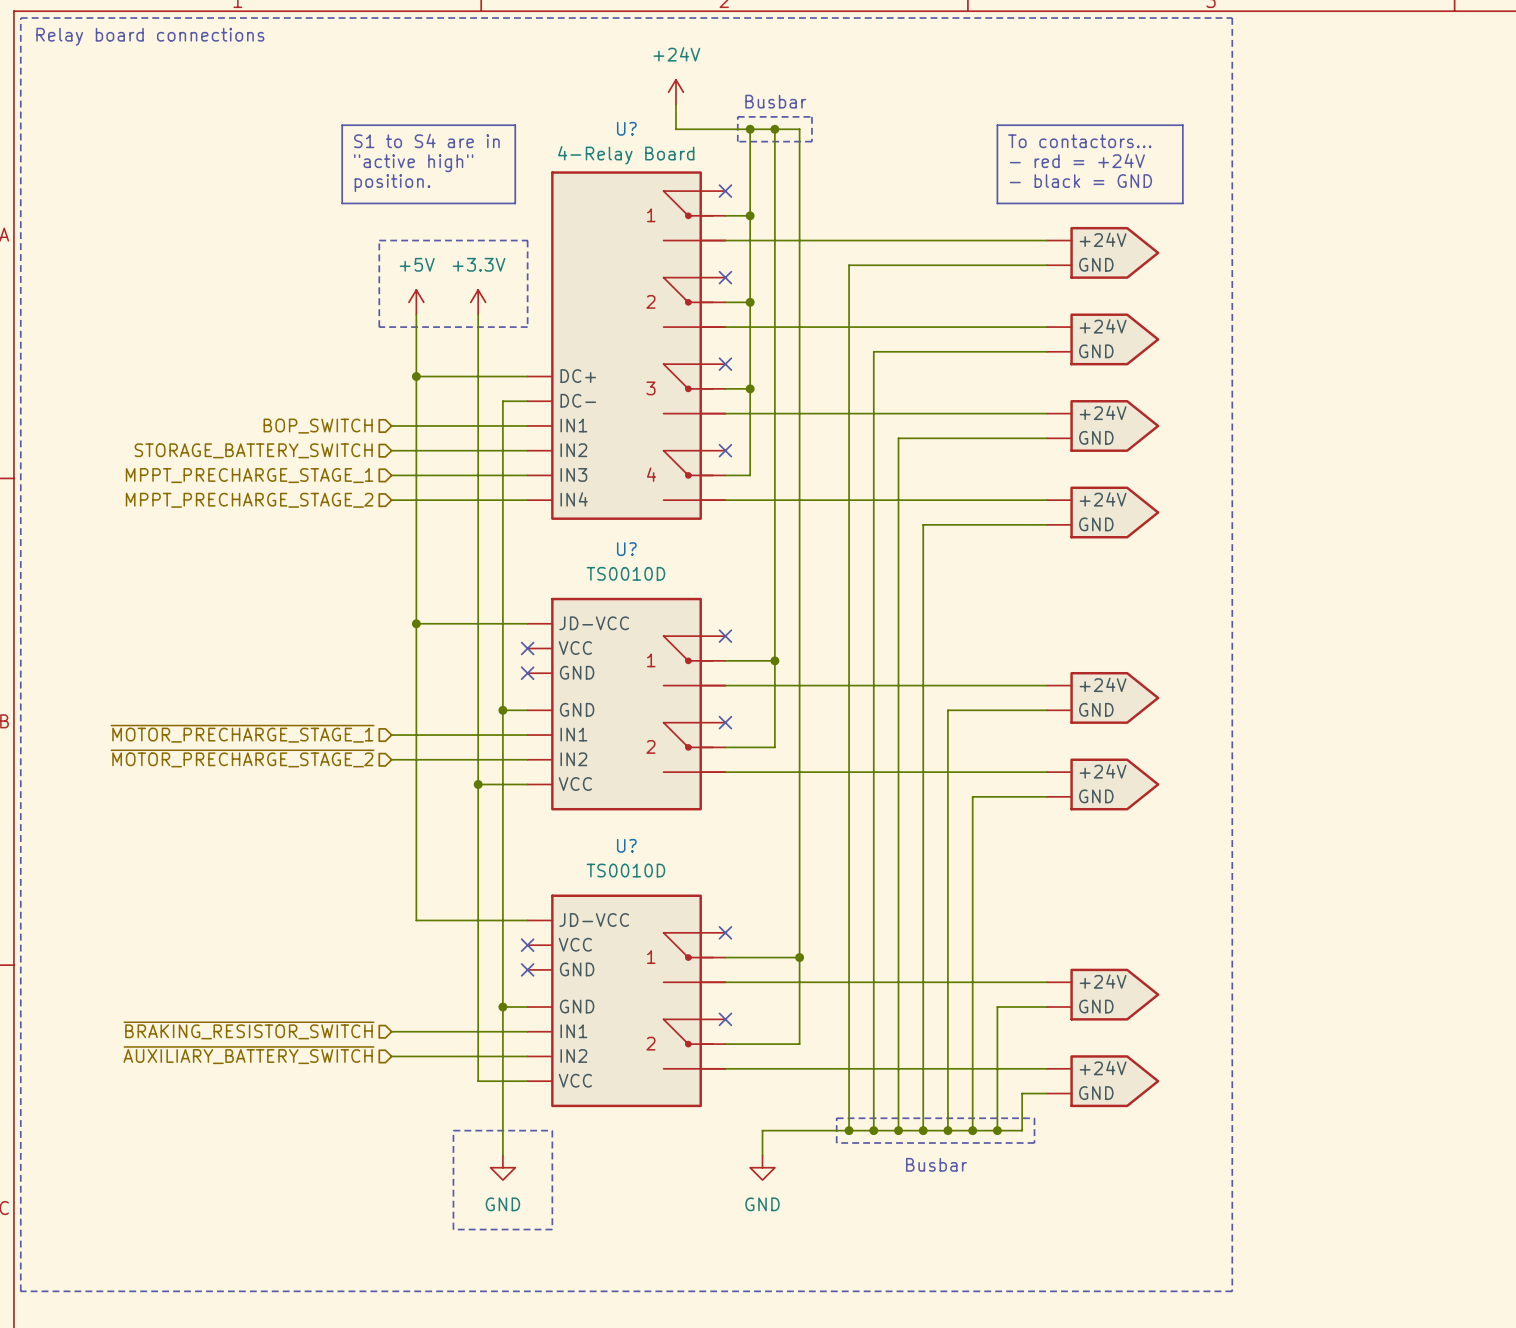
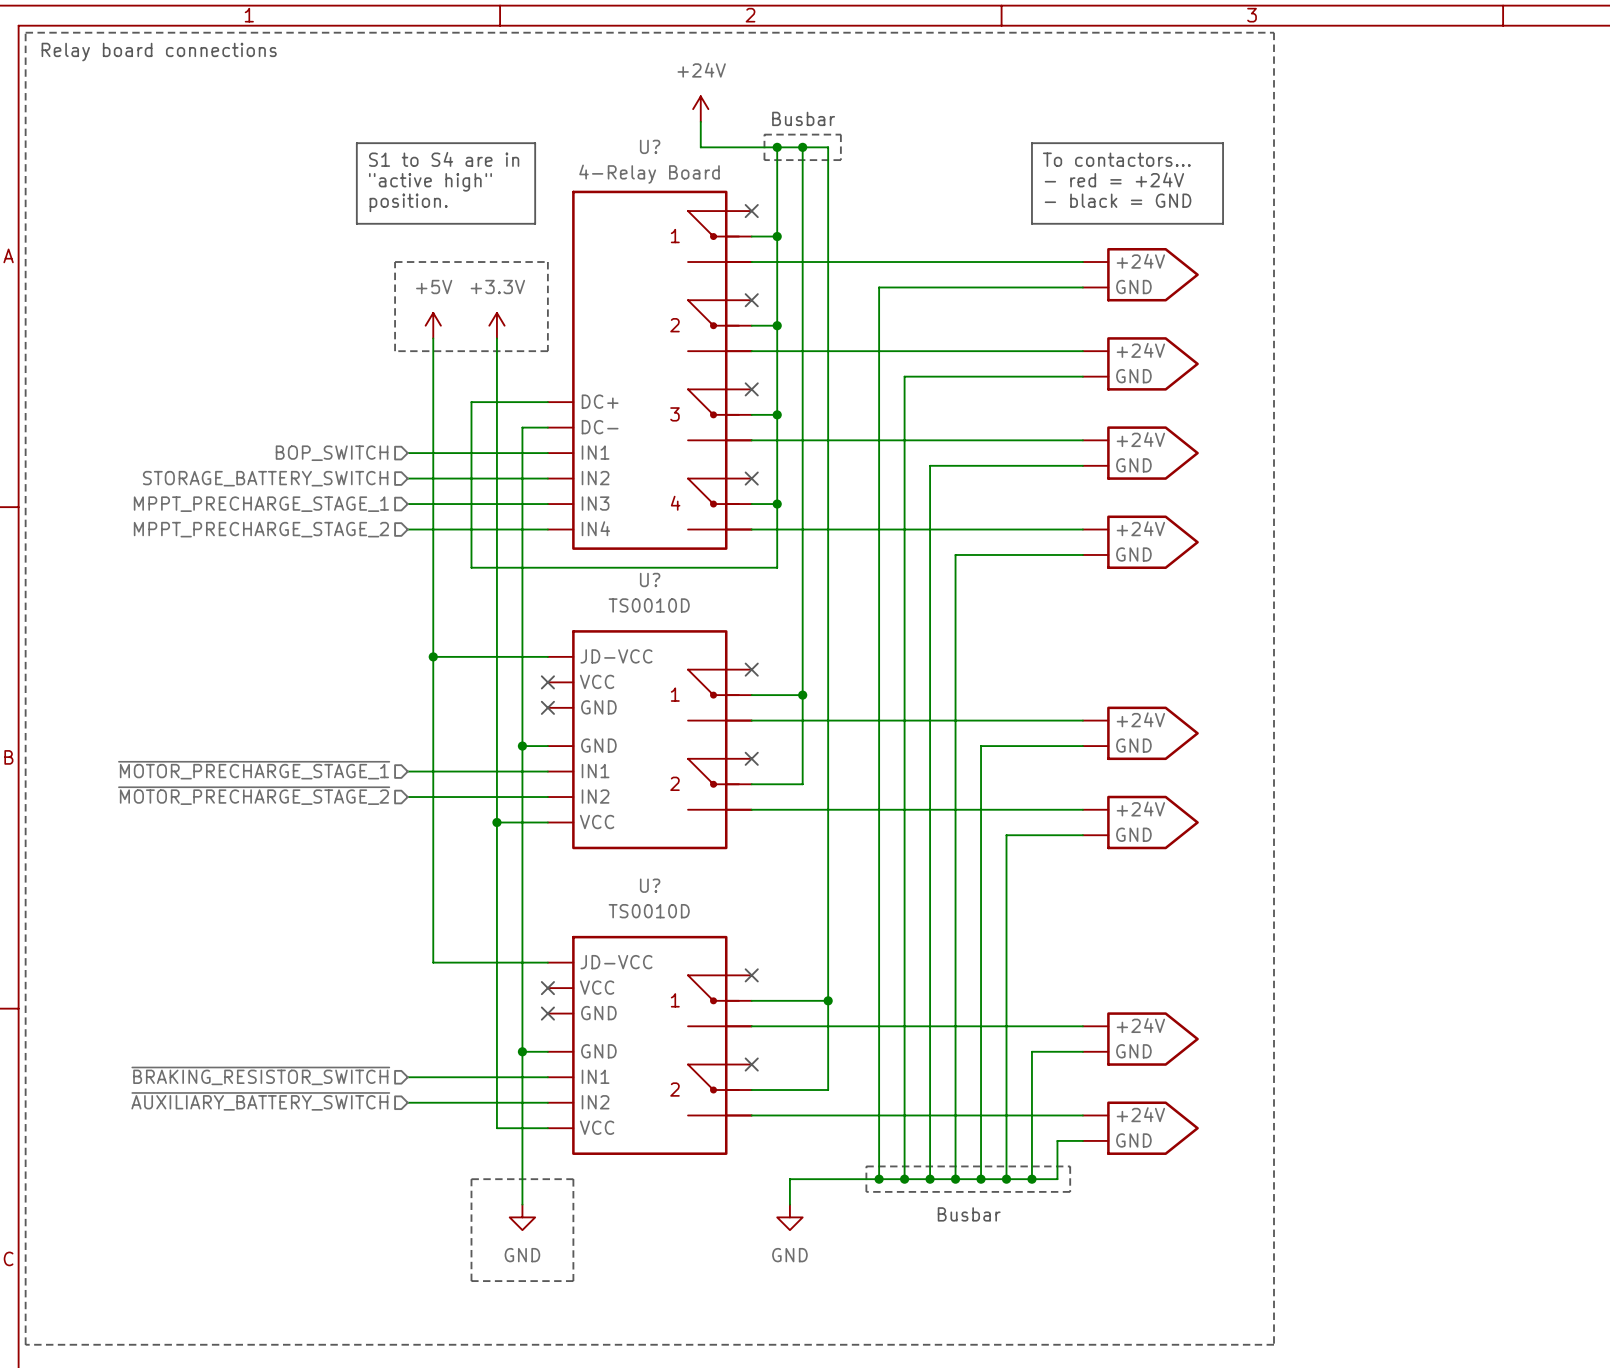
wire: (416, 376) (453, 376) -> (777, 504) (777, 567) (471, 567) (471, 402)
junction: (416, 376) -> none
junction: none -> (777, 504)

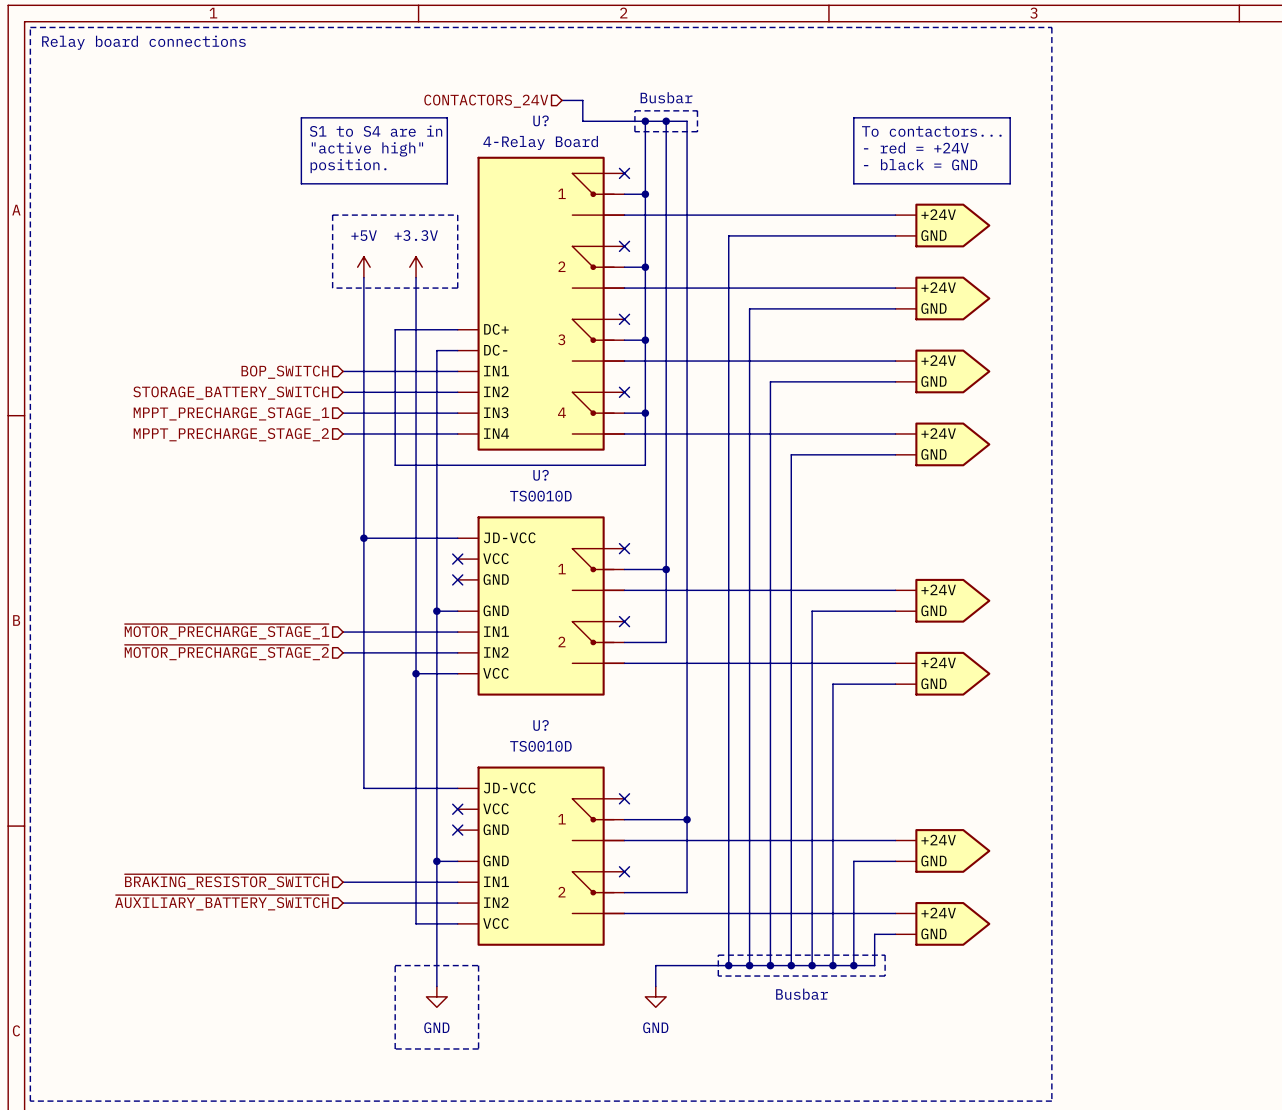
power symbol: +24V (700, 109) -> none
hierarchical label: none -> CONTACTORS_24V (486, 101)
wire: none -> (561, 100) (582, 100)

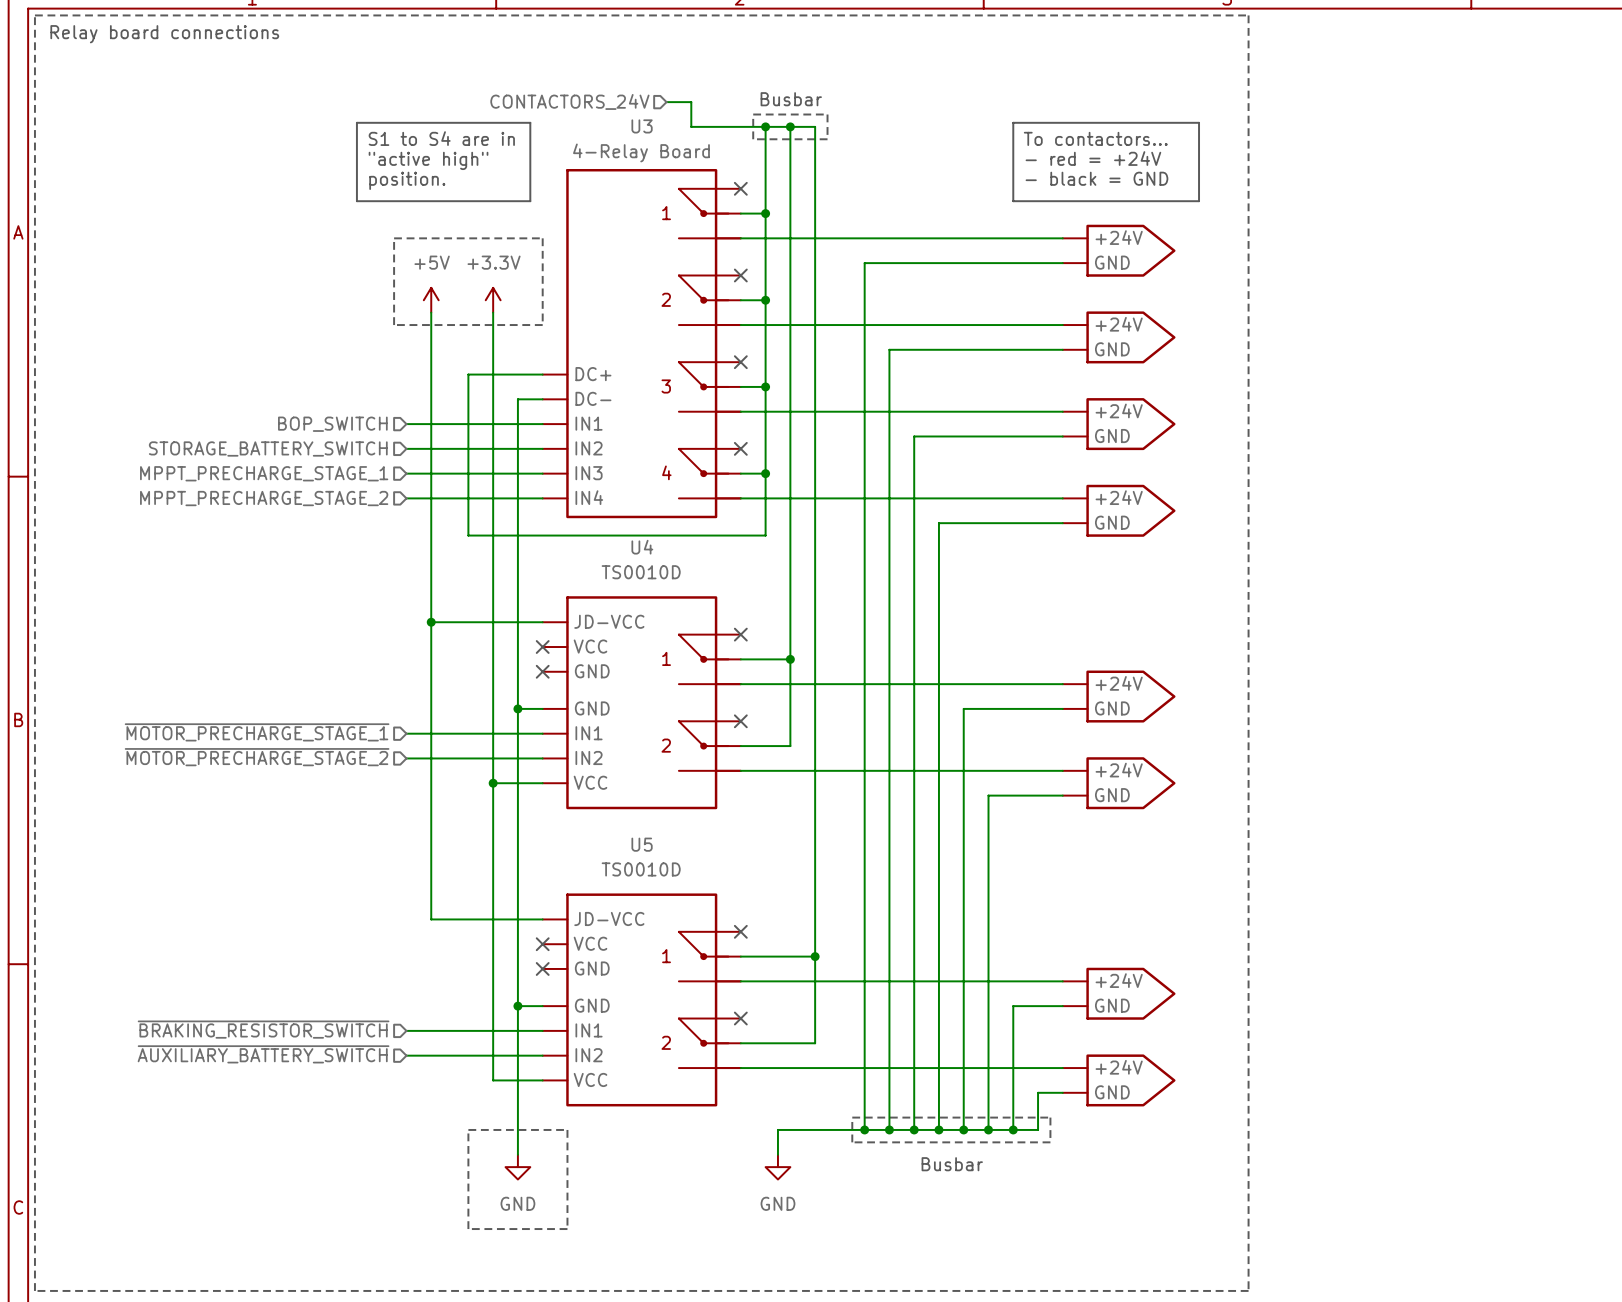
U? name: U? (541, 120) -> U3 (642, 126)
U? name: U? (541, 475) -> U4 (642, 547)
U? name: U? (541, 725) -> U5 (642, 844)

